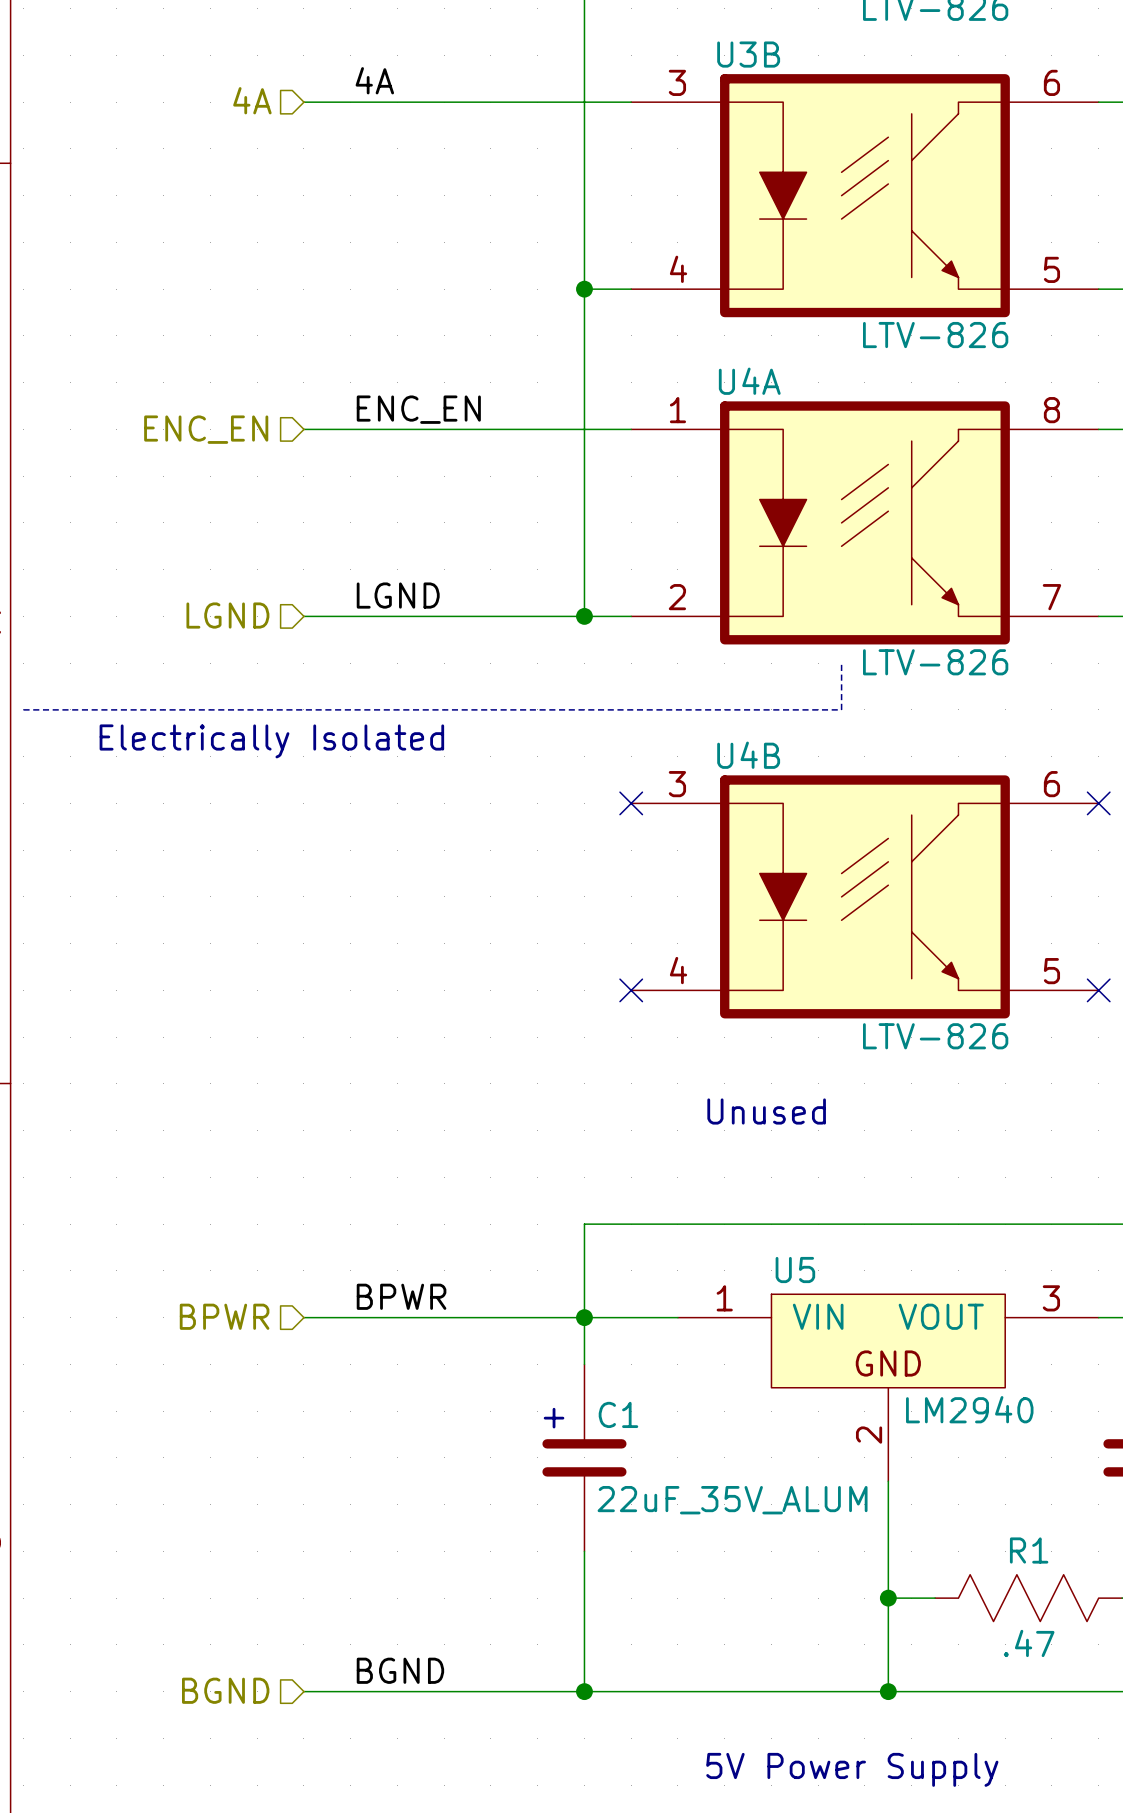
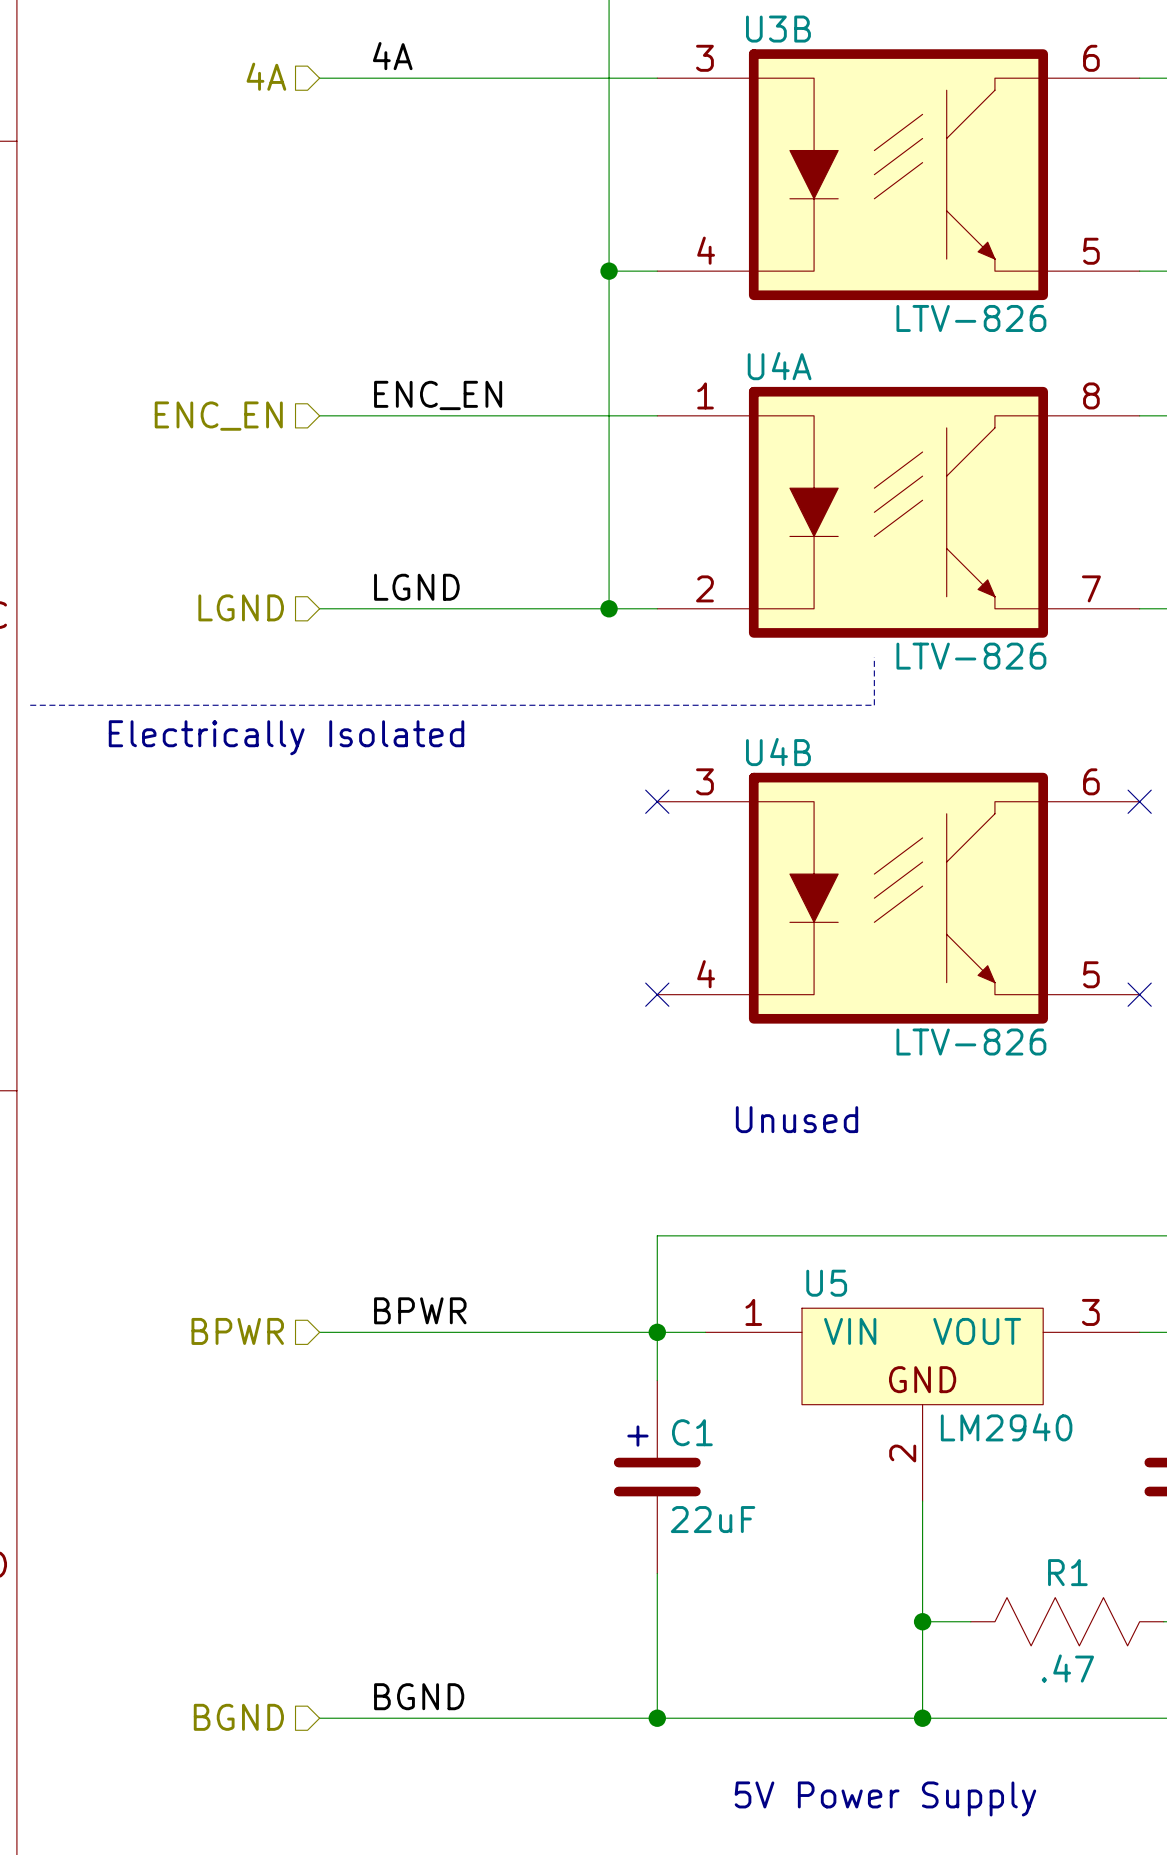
wire: (631, 1224) (584, 1224) (584, 1364) -> (657, 1235) (657, 1380)
junction position: (584, 1317) -> (657, 1332)
text position: + (554, 1418) -> + (637, 1436)
C1 position: (584, 1457) -> (657, 1477)
C1 value: 22uF_35V_ALUM (732, 1500) -> 22uF (713, 1519)
wire: (584, 1551) (584, 1691) -> (657, 1573) (657, 1718)
junction position: (584, 1691) -> (657, 1718)

